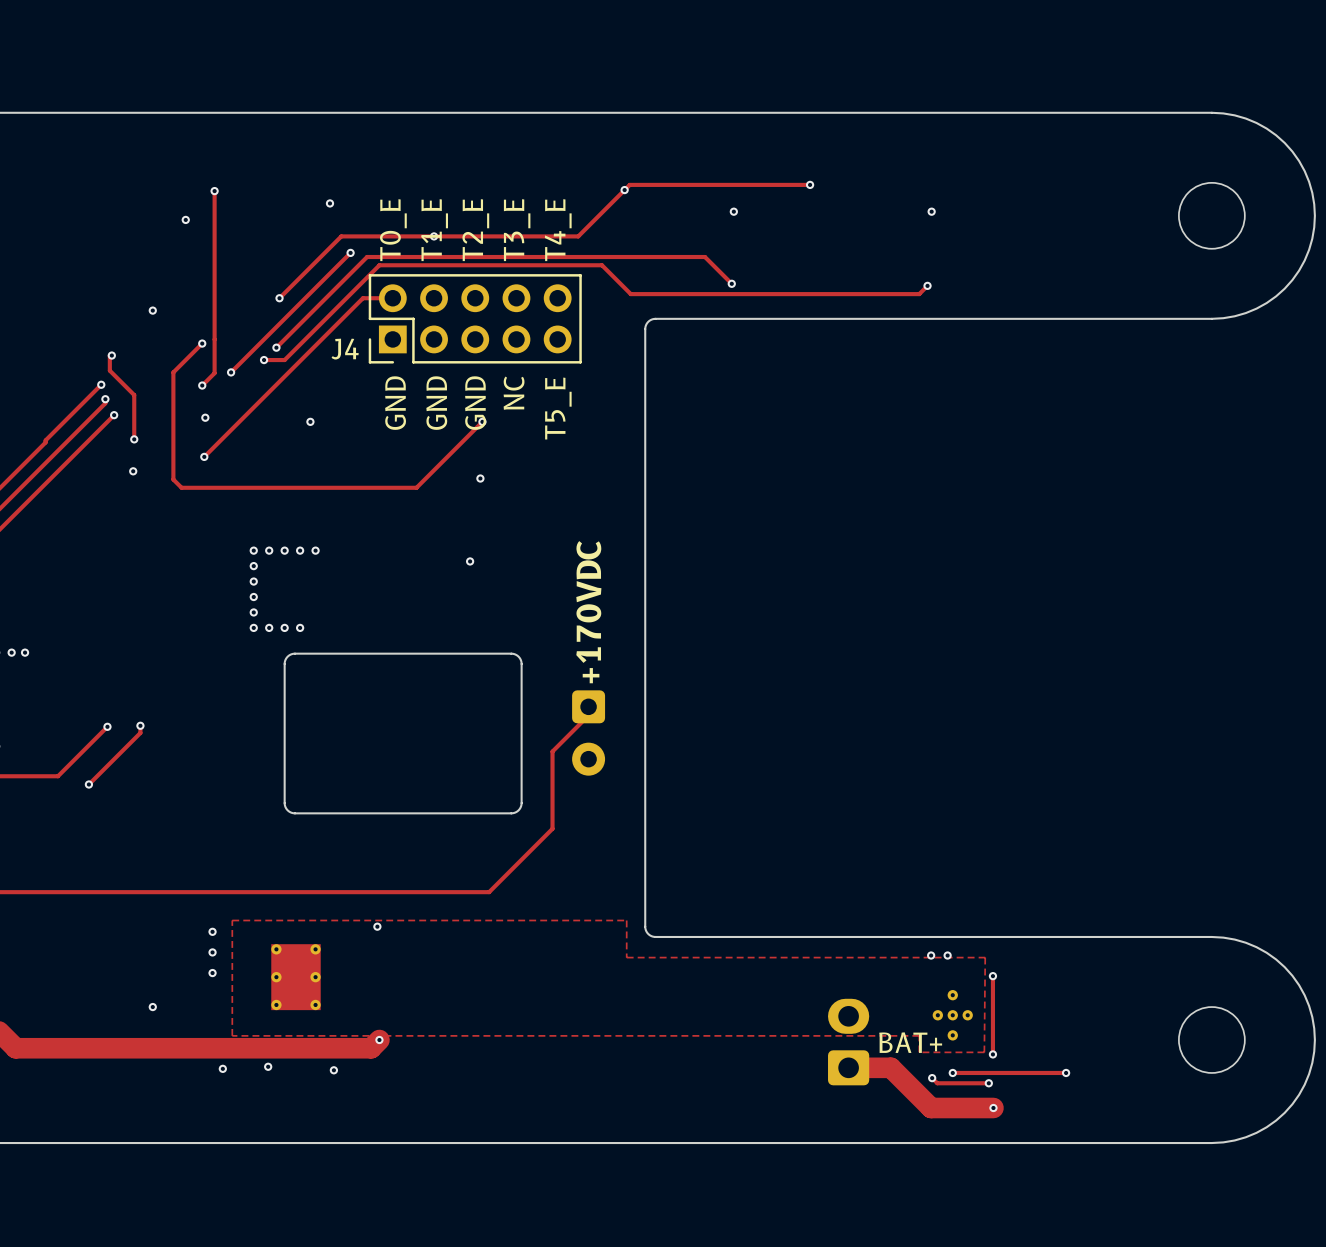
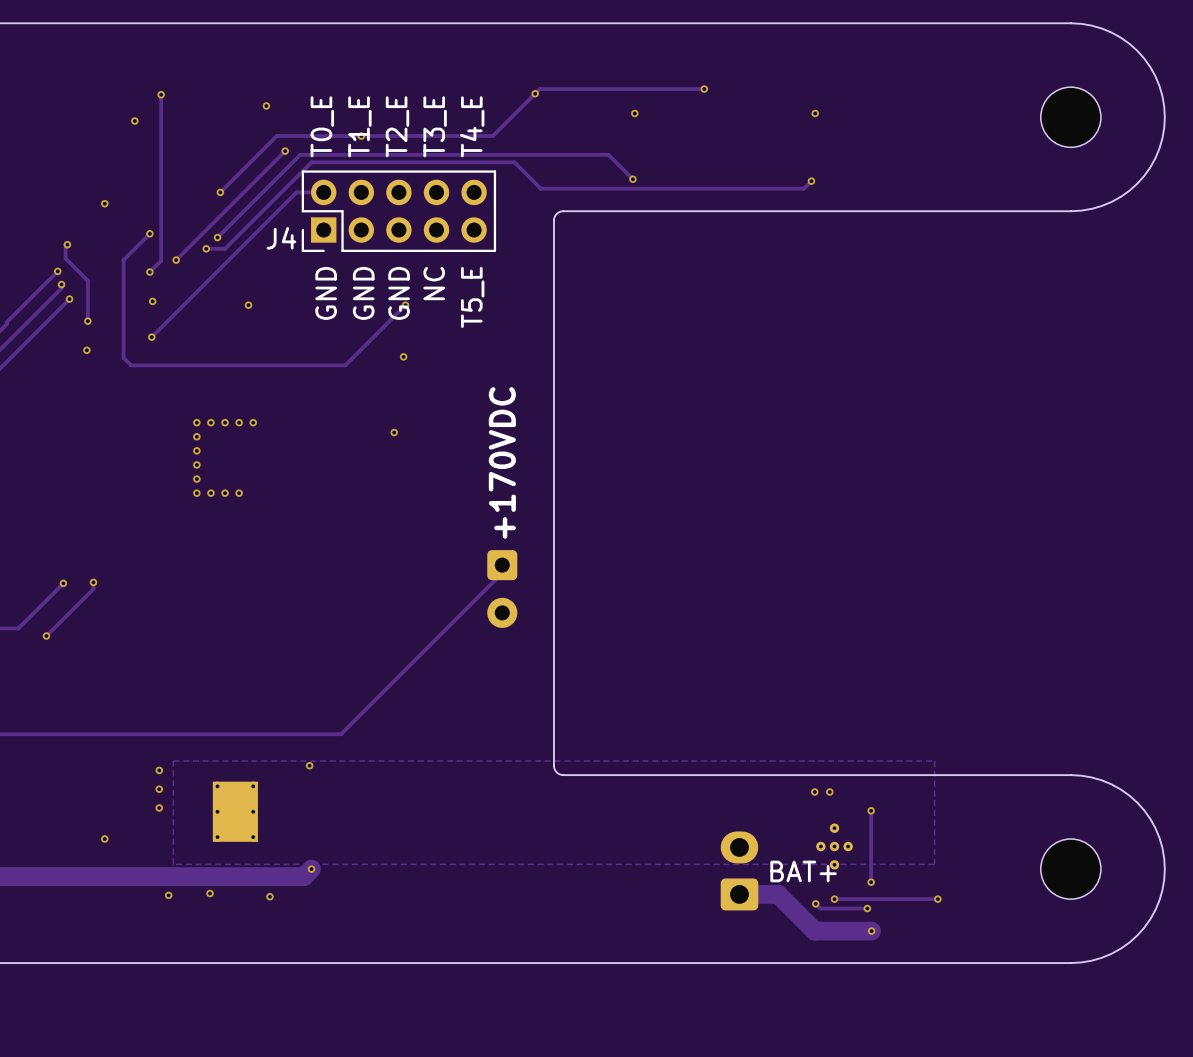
board edge: (294, 653) (511, 653) (517, 655) (521, 663) (521, 803) (519, 809) (511, 813) (294, 813) (288, 811) (284, 803) (284, 663) (287, 656) (294, 653) -> none
track: (552, 751) (552, 828) (489, 892) (411, 892) -> (469, 605) (341, 734)
zone outline: (232, 920) (626, 920) (626, 957) (985, 957) (984, 1052) (919, 1052) (919, 1035) (232, 1035) (232, 920) -> (173, 761) (173, 864) (934, 864) (934, 761) (173, 761)

